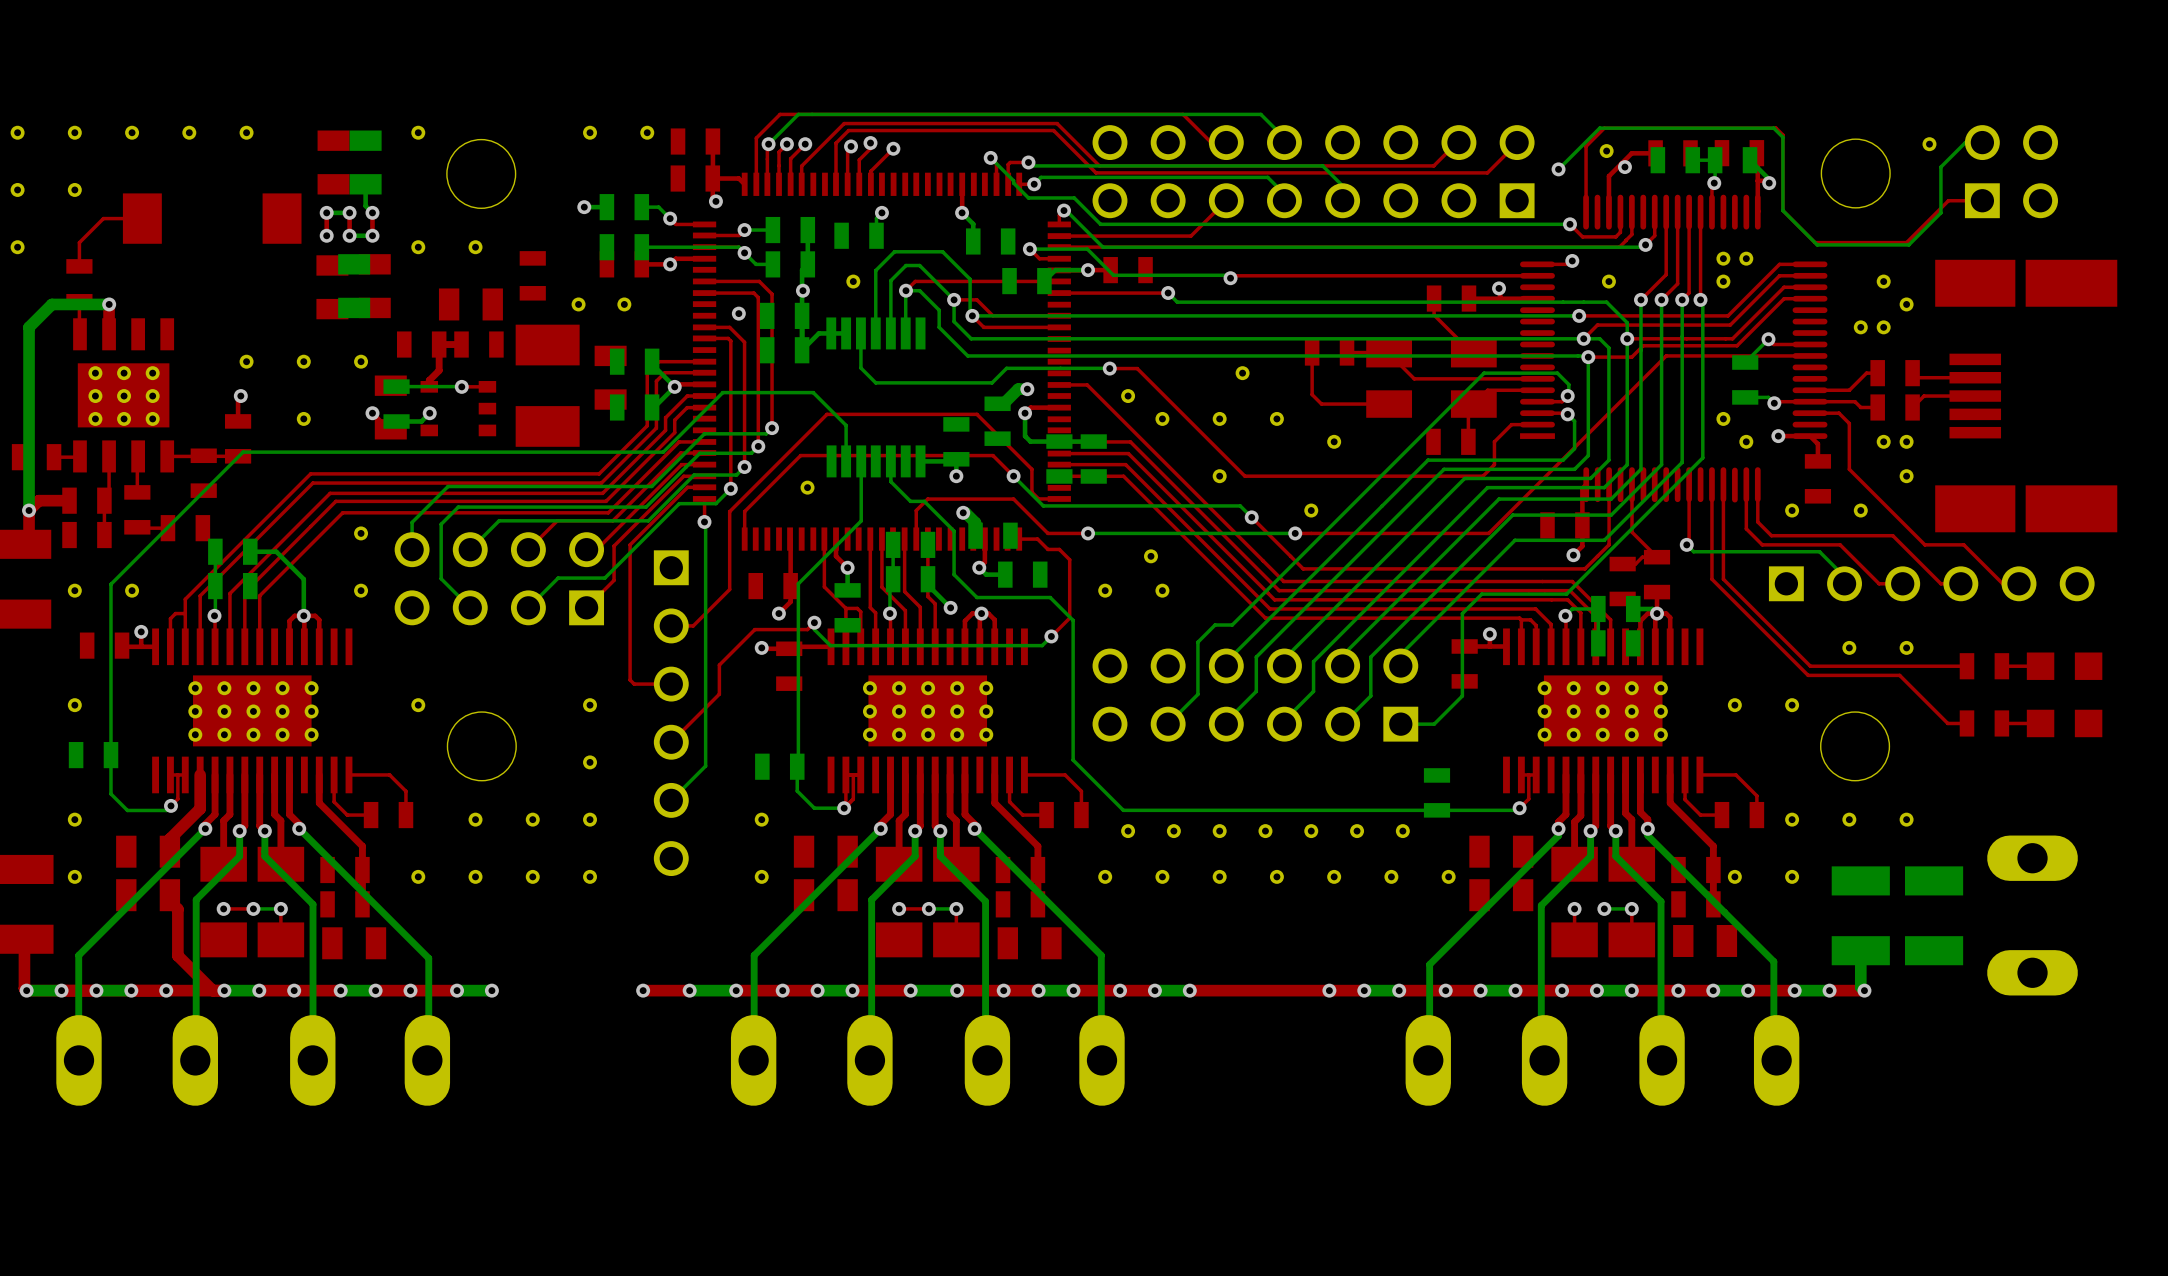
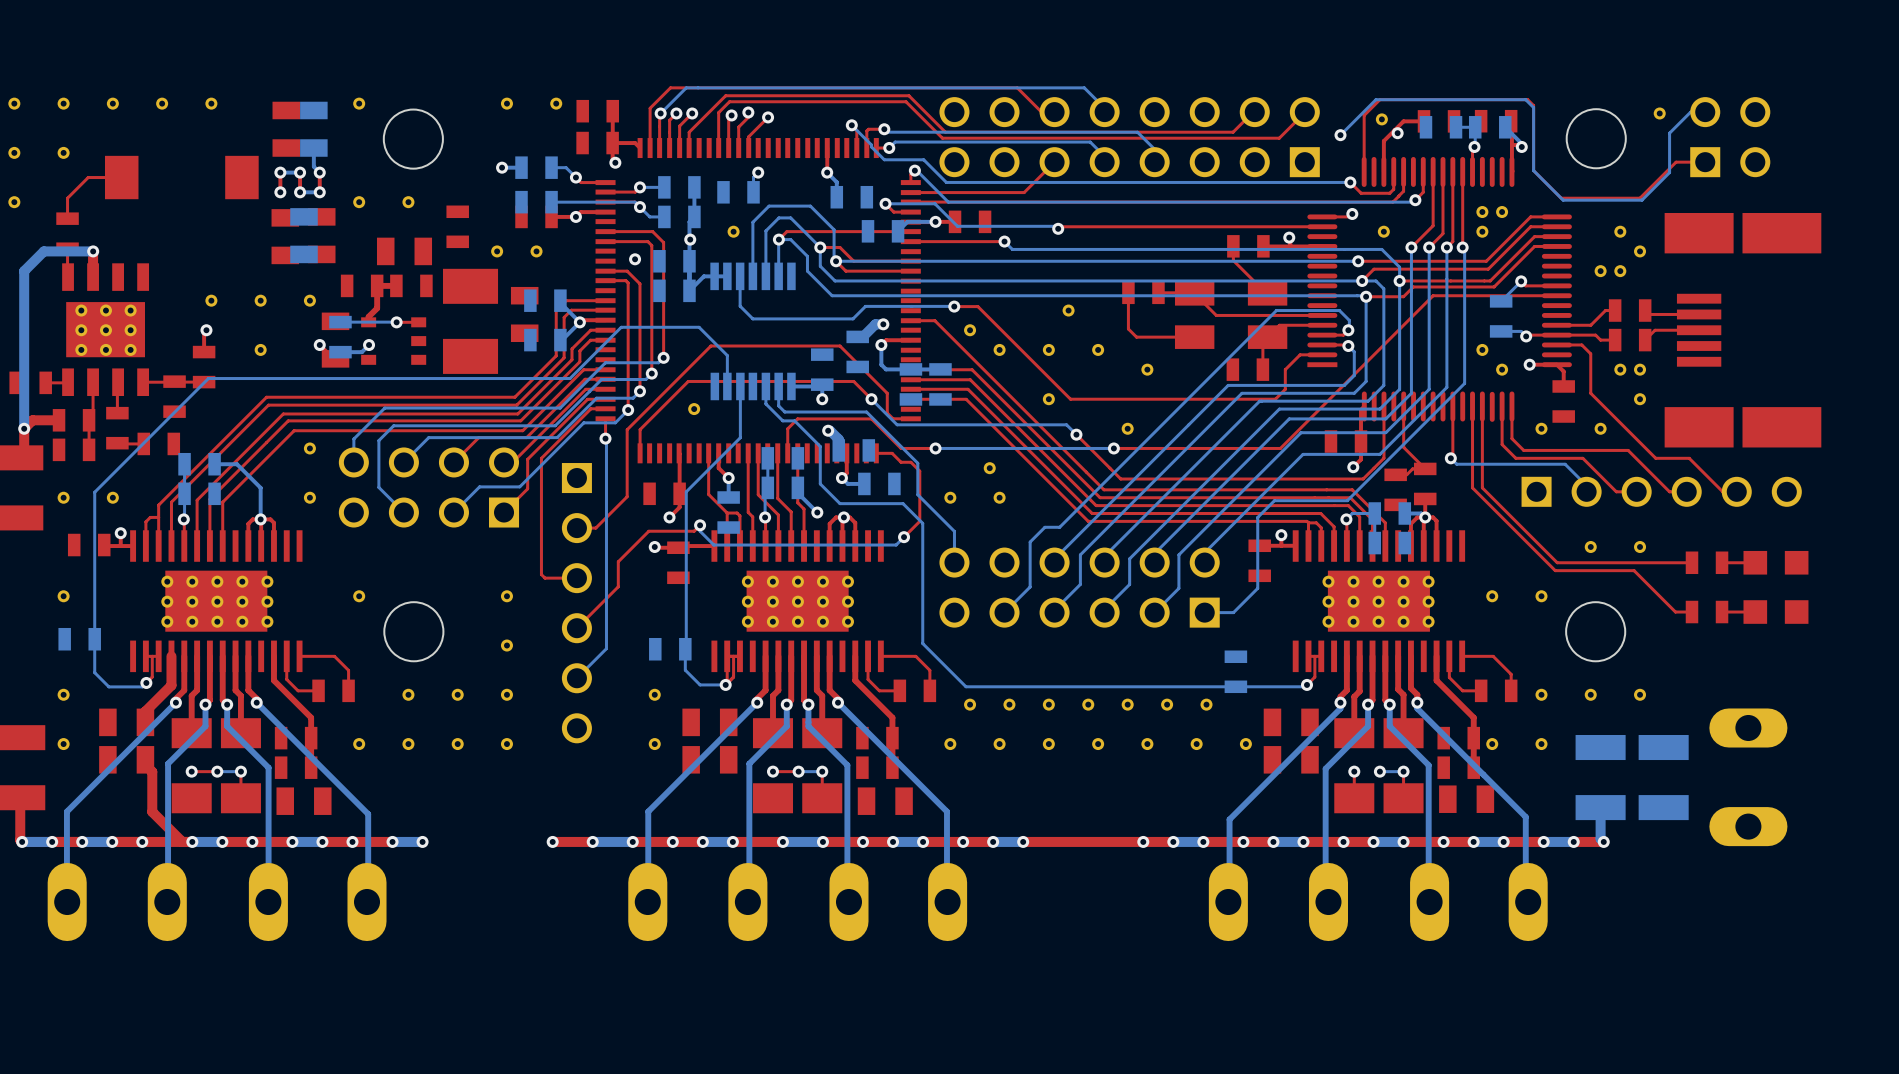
bottom track: none -> (778, 386) (778, 405) (784, 412) (866, 412) (917, 463) (917, 494) (954, 531) (954, 562)

